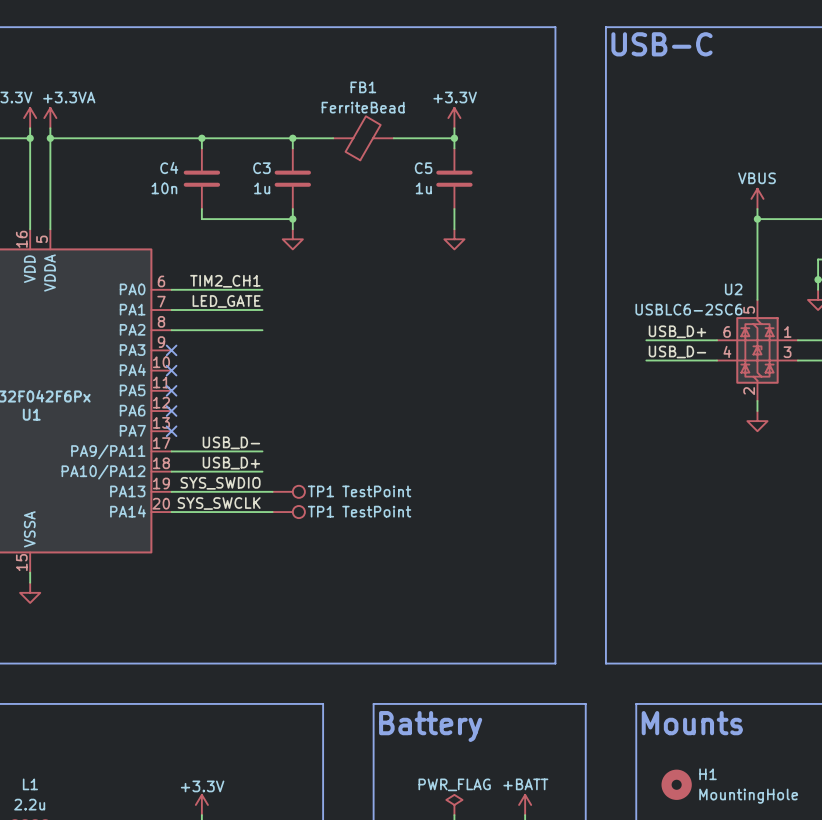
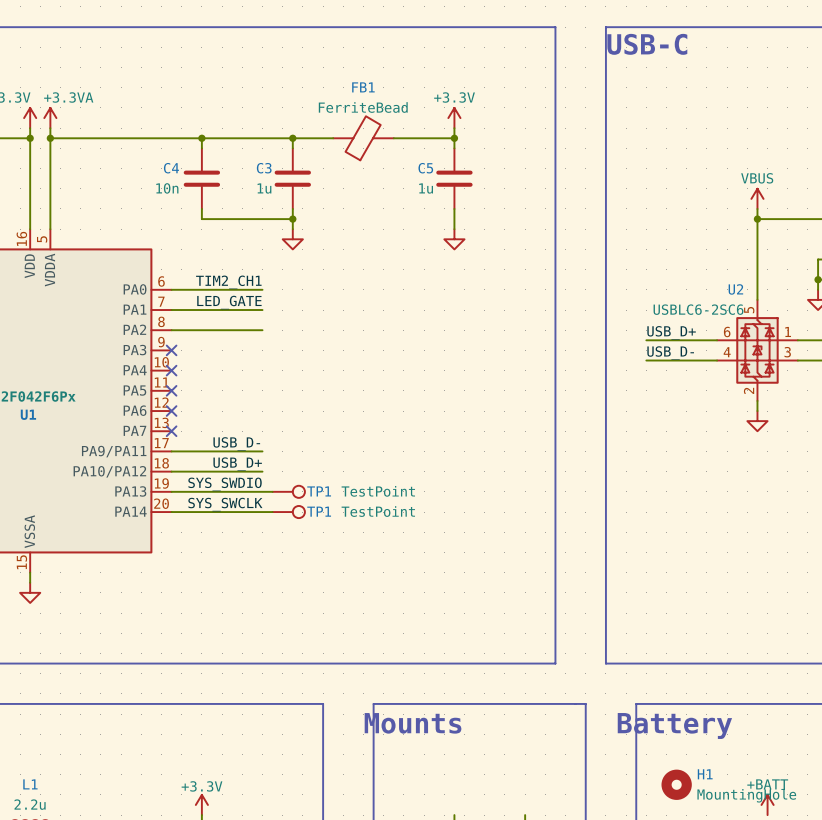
text: none -> Mounts (413, 723)
text: Mounts (692, 723) -> none
text: Battery (430, 726) -> none
text: none -> Battery (674, 725)
power symbol: PWR_FLAG (454, 804) -> none
power symbol: +BATT (525, 804) -> none
power symbol: none -> +BATT (767, 804)

